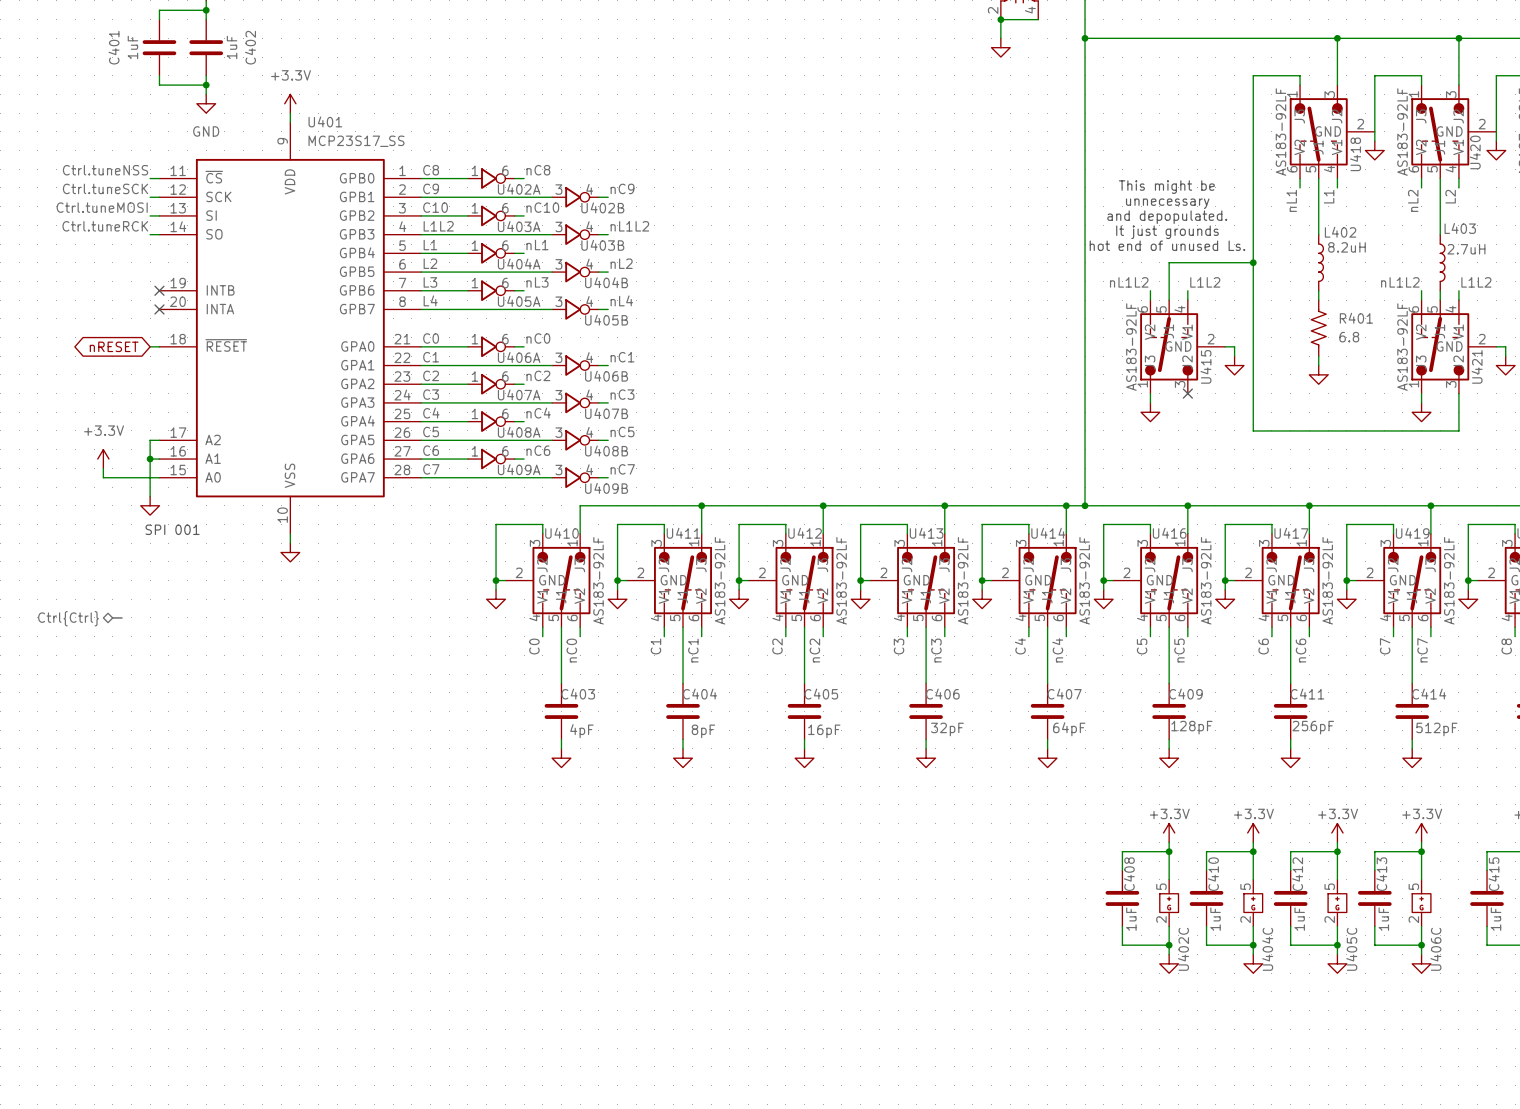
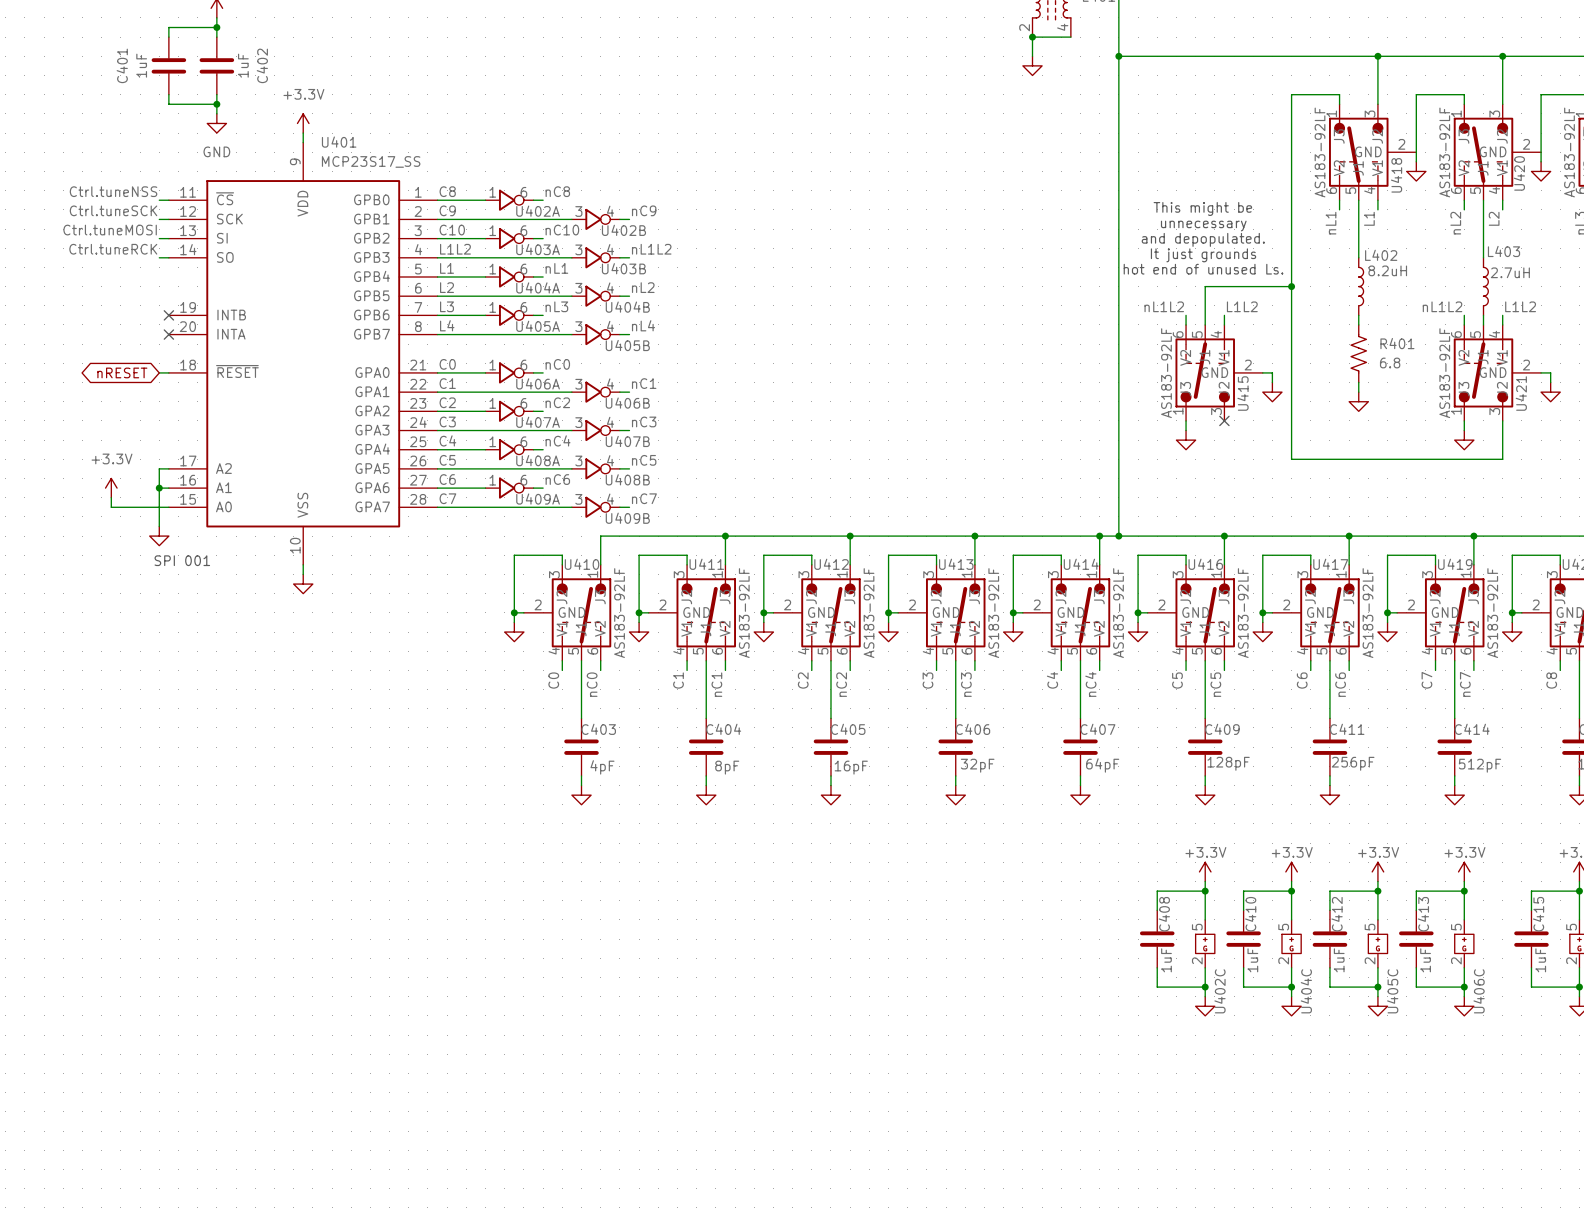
bus: (112, 617) (122, 617) -> none
hierarchical label: Ctrl{Ctrl} (68, 618) -> none

